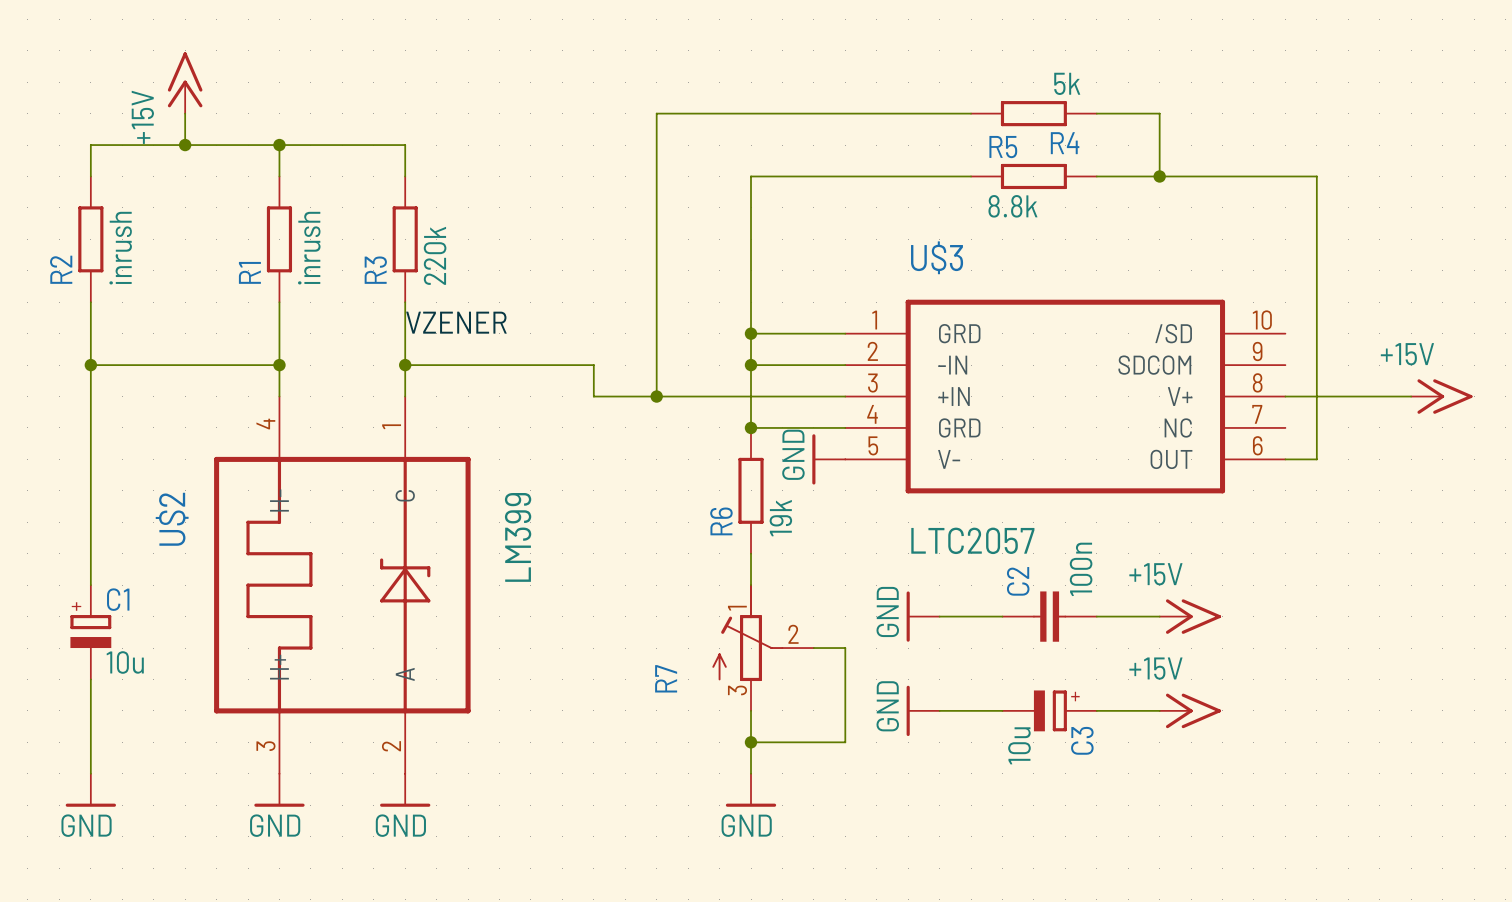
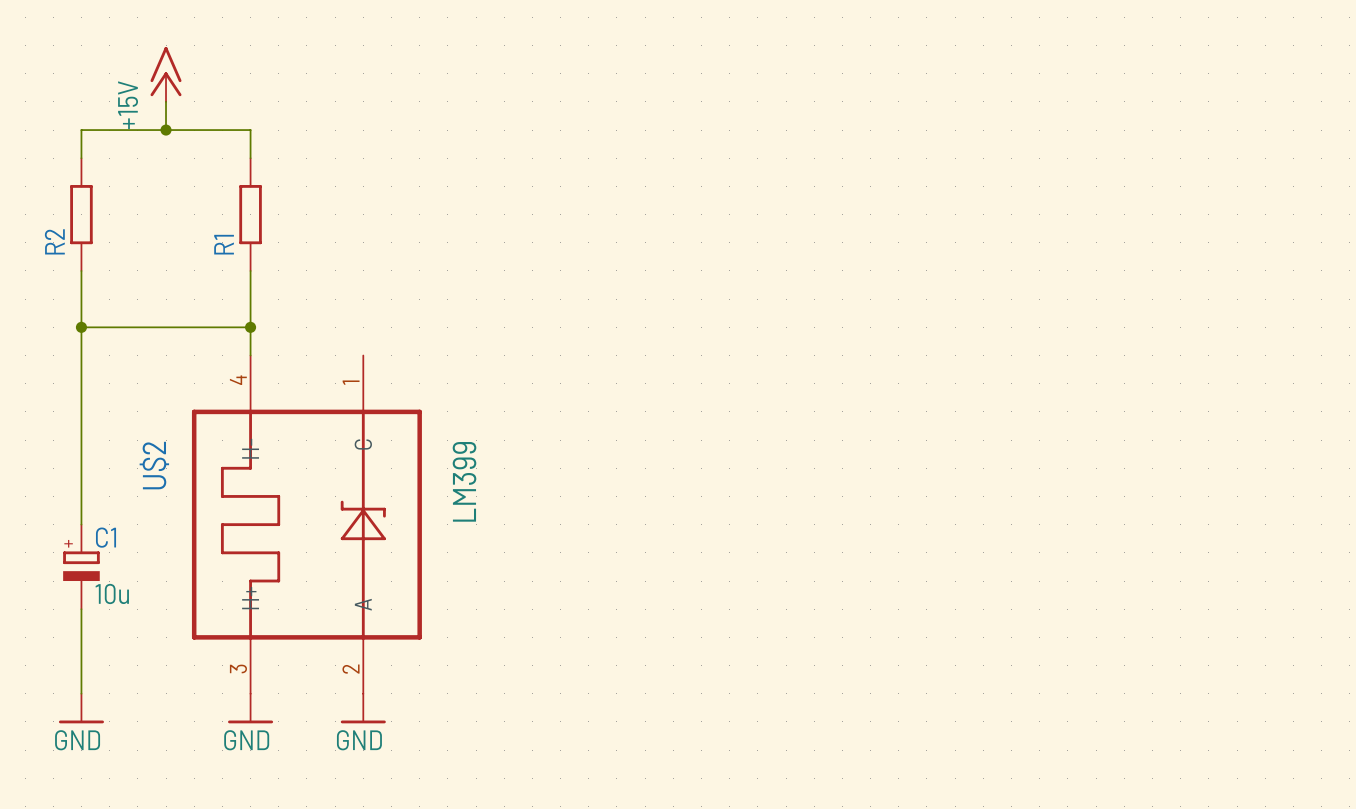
wire: (971, 113) (656, 113) (656, 396) -> none
R4: 5k (1033, 113) -> none
wire: (1096, 113) (1159, 113) (1159, 176) -> none
wire: (279, 145) (405, 145) (405, 176) -> none
junction: (279, 145) -> none
wire: (971, 176) (751, 176) (751, 427) (845, 427) -> none
R5: 8.8k (1033, 176) -> none
wire: (1096, 176) (1316, 176) (1316, 459) (1285, 459) -> none
junction: (1159, 176) -> none
R3: 220k (405, 239) -> none
R2 value: inrush (120, 248) -> none
R1 value: inrush (309, 248) -> none
wire: (405, 302) (405, 396) -> none
label: VZENER (456, 322) -> none
wire: (751, 333) (845, 333) -> none
junction: (751, 333) -> none
wire: (405, 365) (593, 365) (593, 396) (845, 396) -> none
junction: (405, 365) -> none
wire: (751, 365) (845, 365) -> none
junction: (751, 365) -> none
junction: (656, 396) -> none
U$3: LTC2057 (1065, 396) -> none
wire: (1285, 396) (1411, 396) -> none
power symbol: +15V (1441, 396) -> none
junction: (751, 427) -> none
power symbol: GND (828, 459) -> none
R6: 19k (751, 490) -> none
wire: (751, 553) (751, 585) -> none
power symbol: GND (923, 616) -> none
wire: (939, 616) (1002, 616) -> none
C2: 100n (1049, 616) -> none
wire: (1096, 616) (1159, 616) -> none
power symbol: +15V (1190, 616) -> none
R7: (763, 647) -> none
wire: (813, 648) (845, 648) (845, 742) (751, 742) -> none
wire: (751, 710) (751, 773) -> none
power symbol: GND (923, 710) -> none
wire: (939, 710) (1002, 710) -> none
C3: 10u (1049, 710) -> none
wire: (1096, 710) (1159, 710) -> none
power symbol: +15V (1190, 710) -> none
junction: (751, 742) -> none
power symbol: GND (751, 790) -> none

